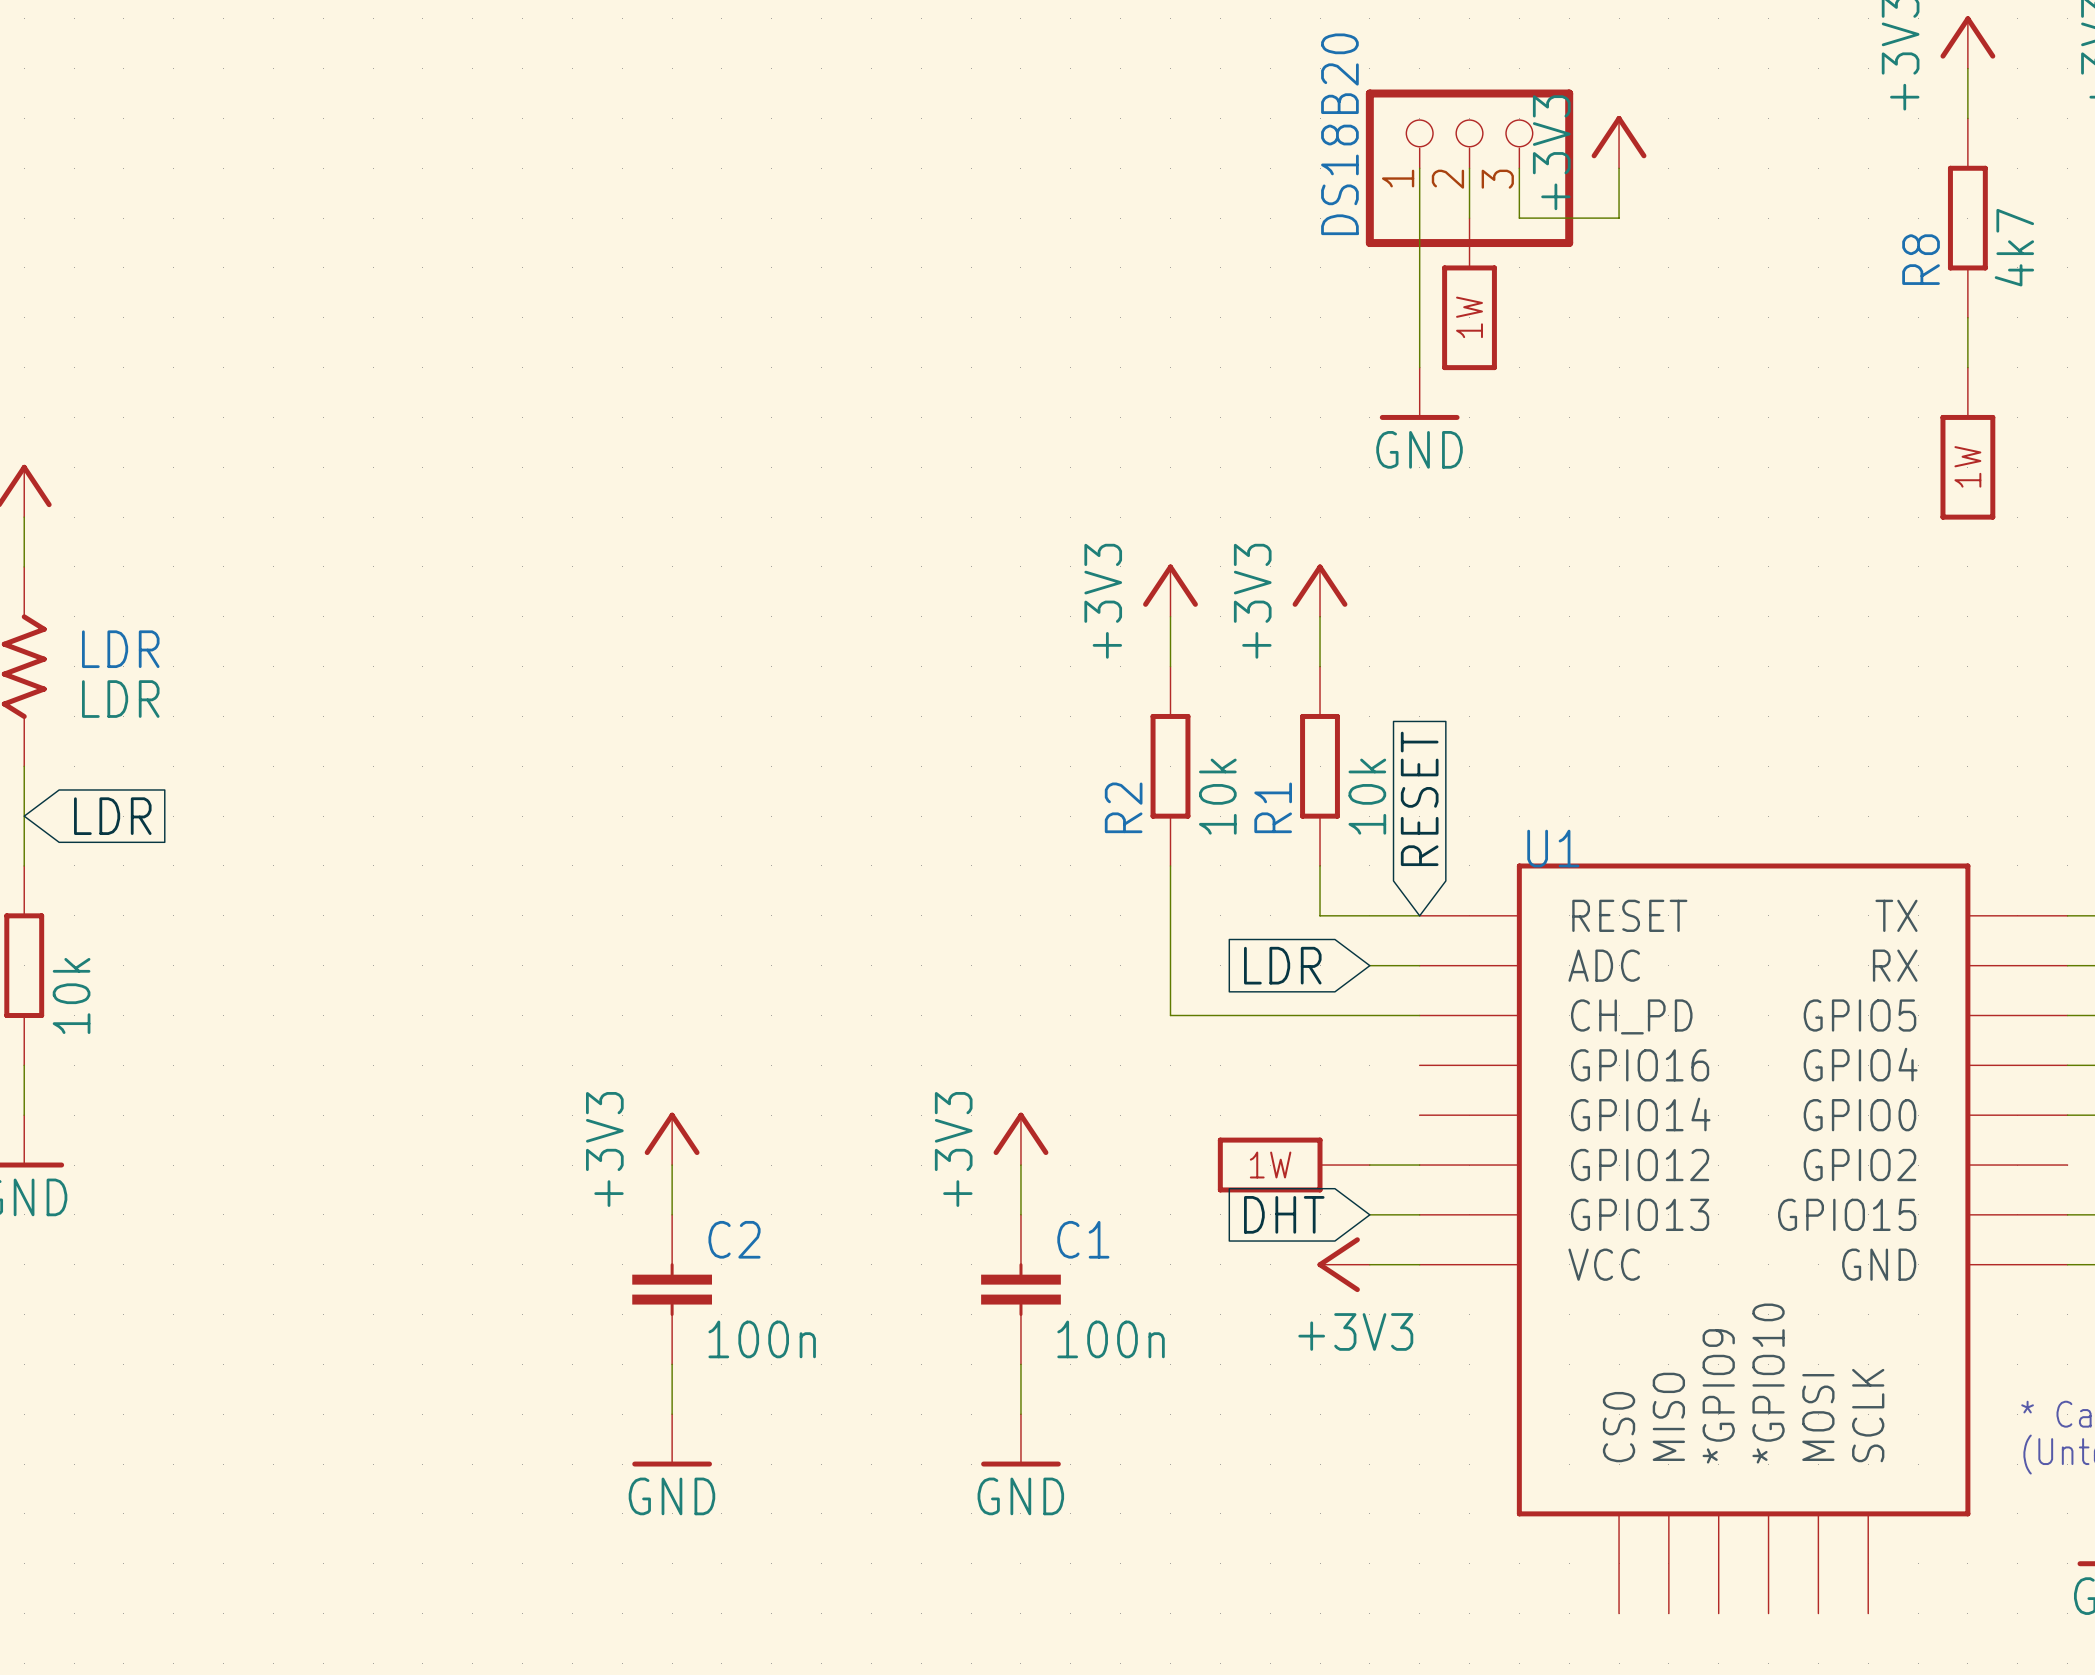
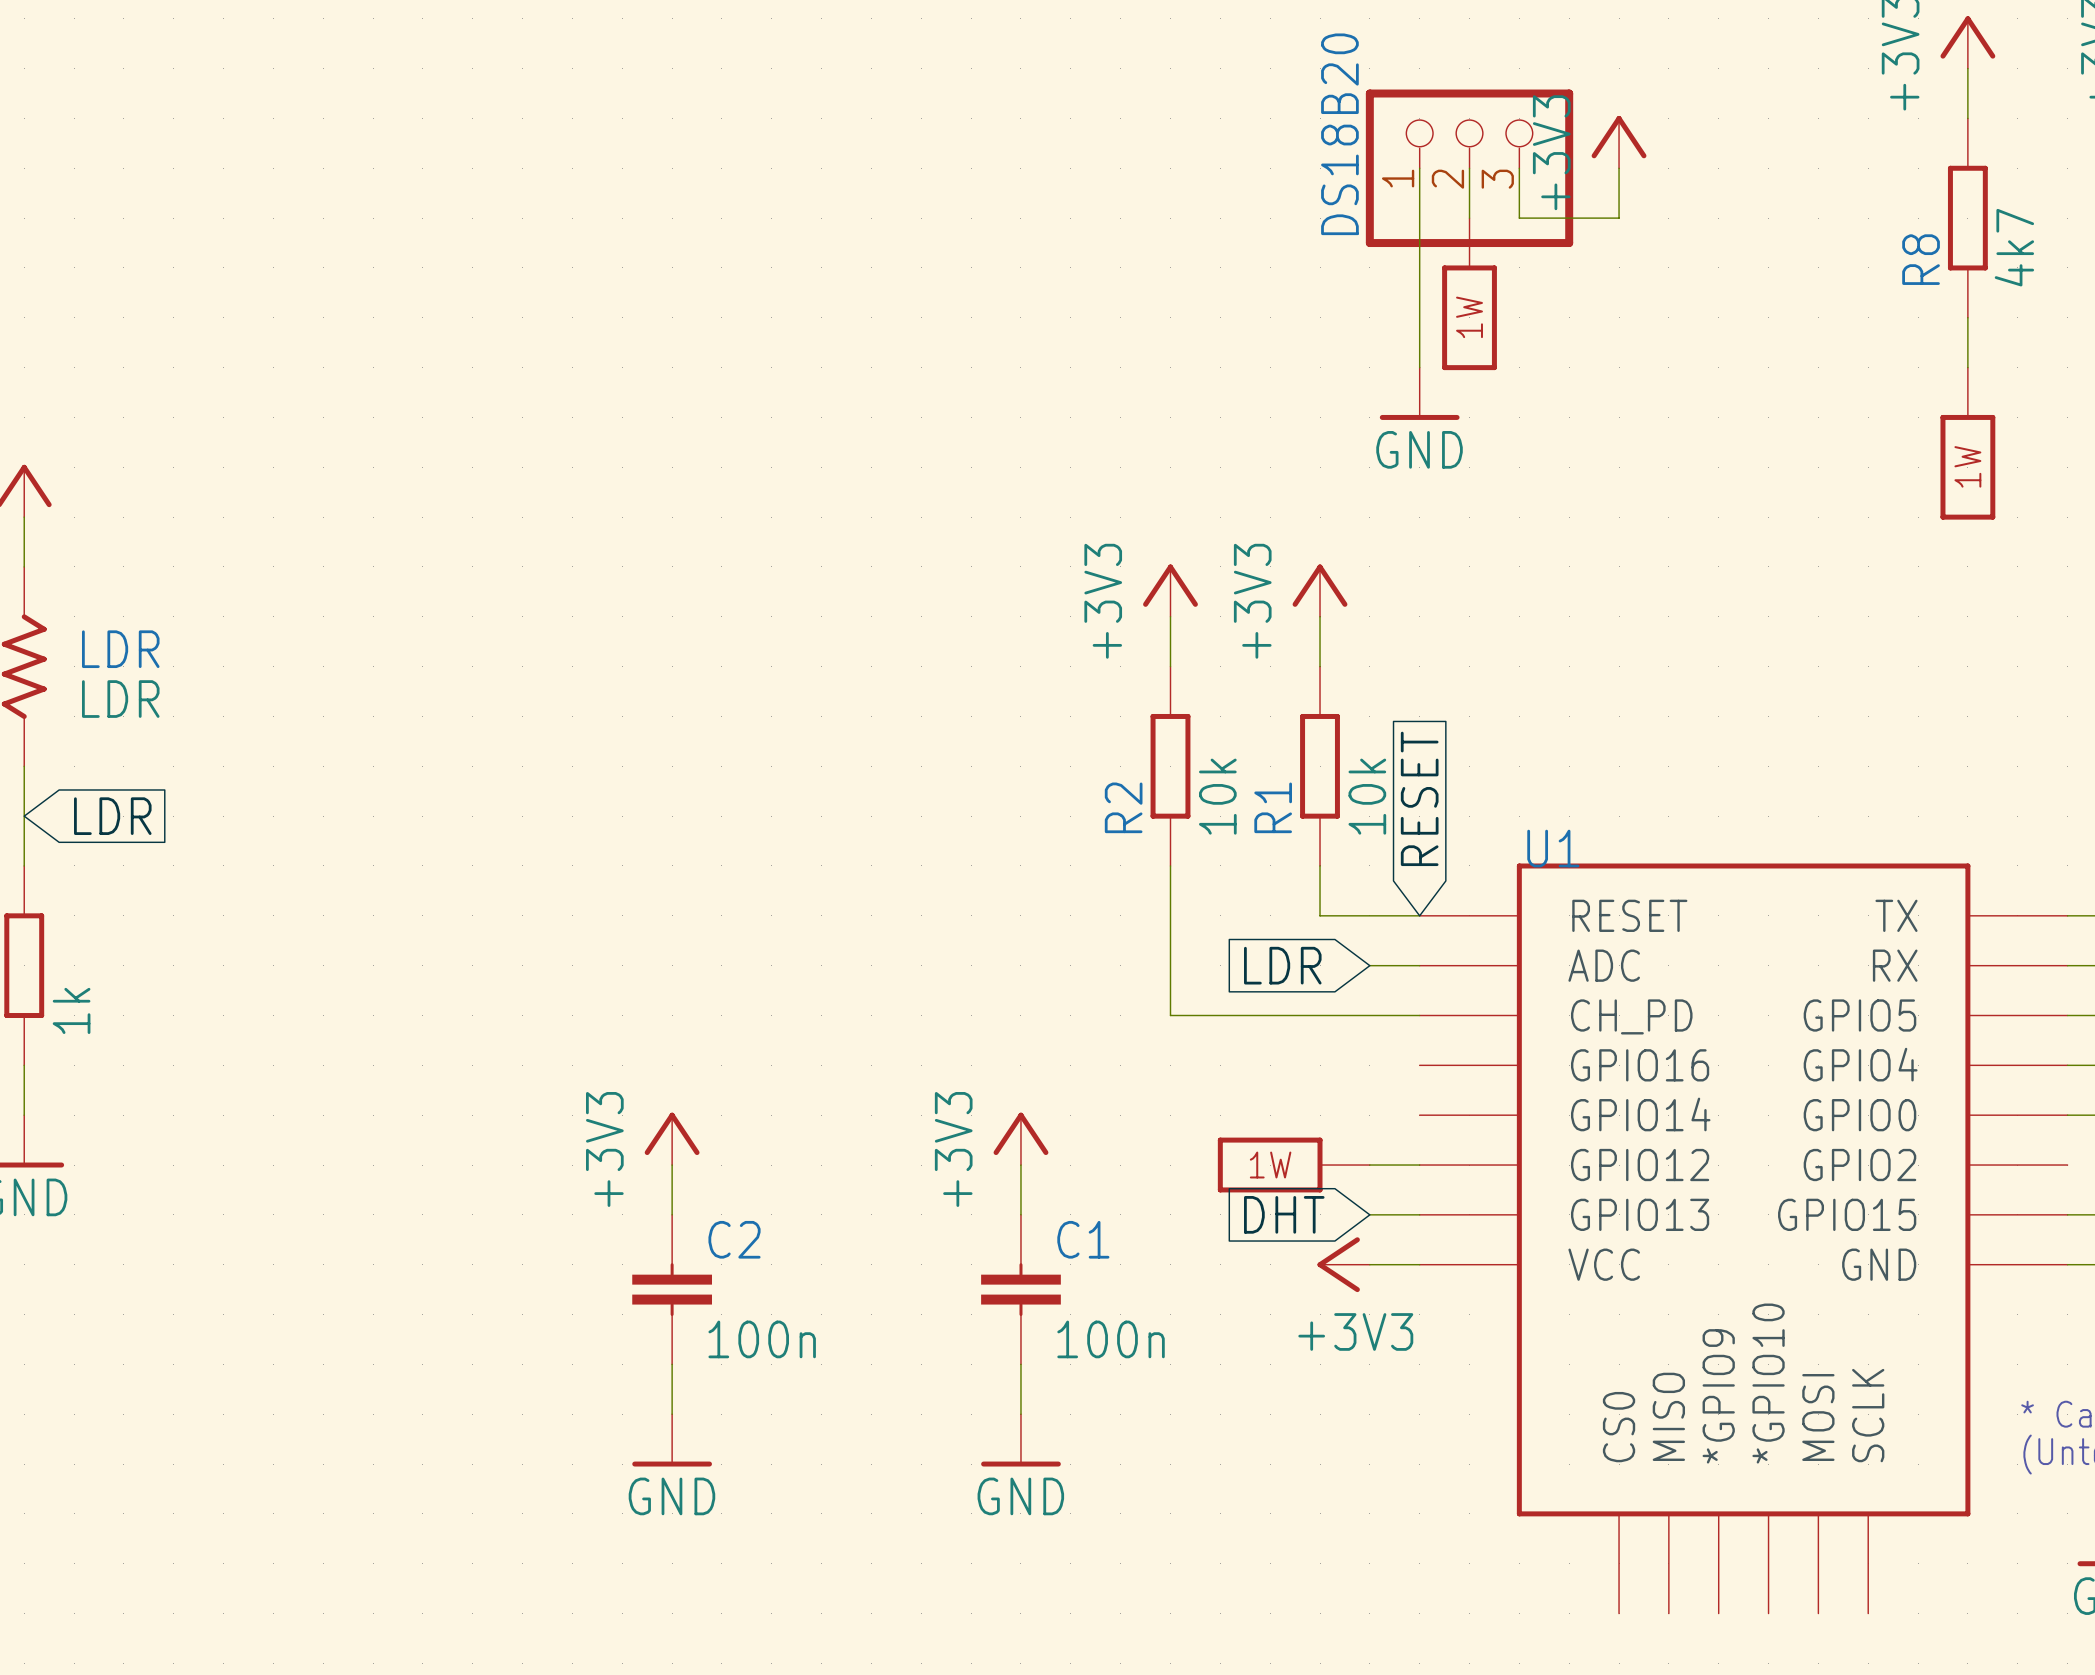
part value: 10k (71, 995) -> 1k (71, 1010)

